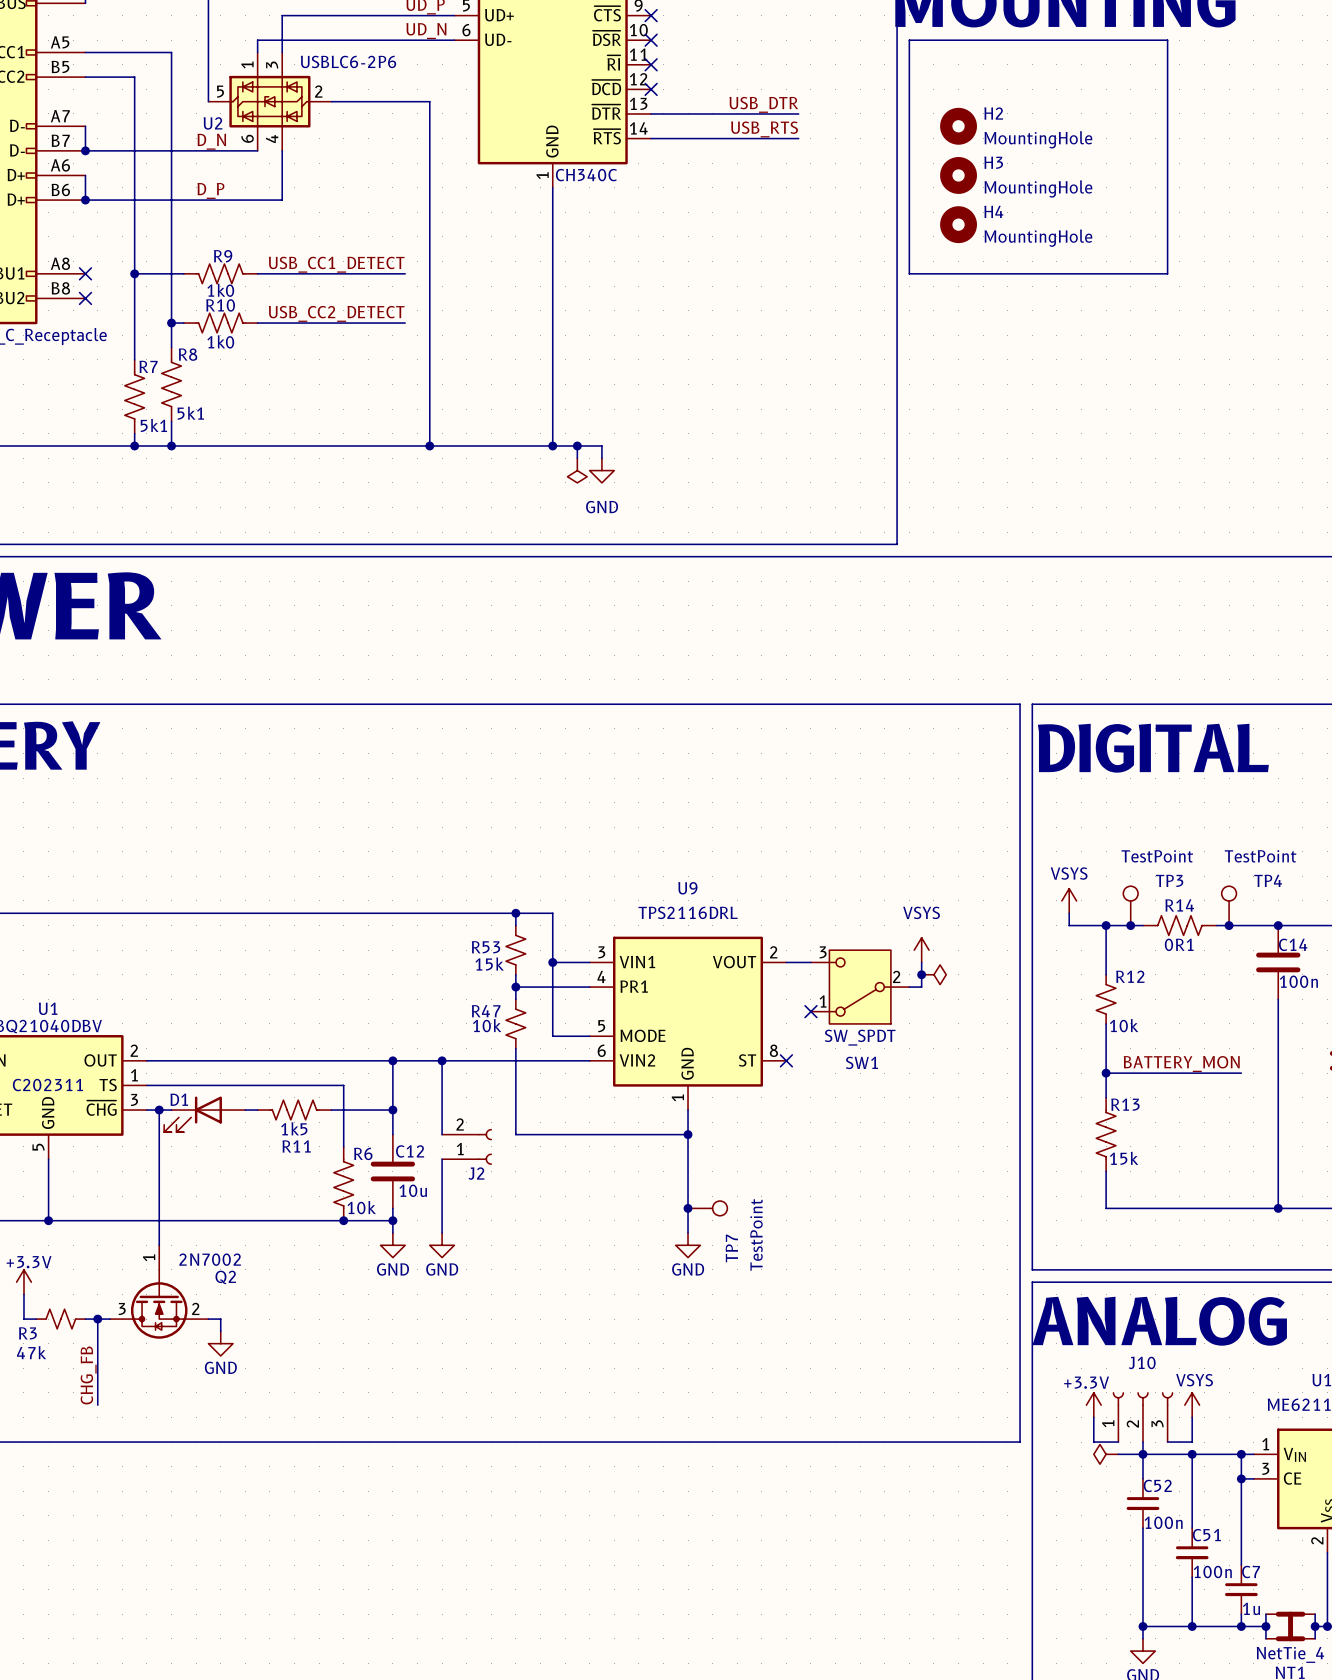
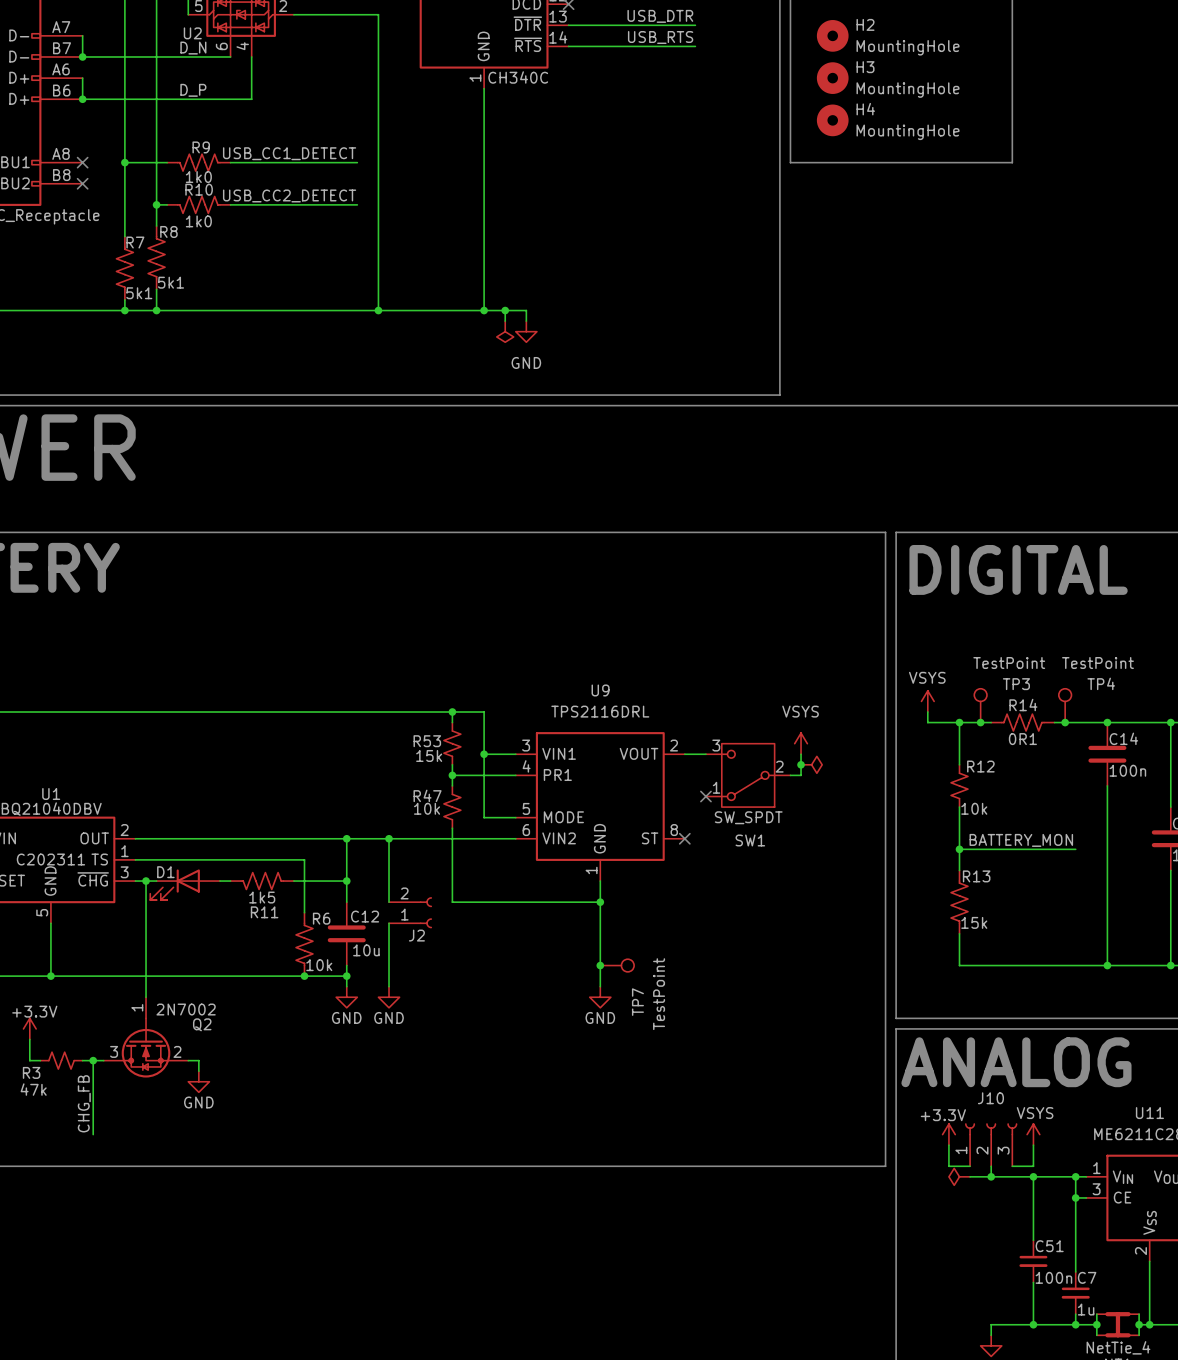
wire: (1142, 1454) (1142, 1478) -> none
C52: 100n (1142, 1503) -> none
wire: (1142, 1528) (1142, 1626) -> none
junction: (1142, 1626) -> none

